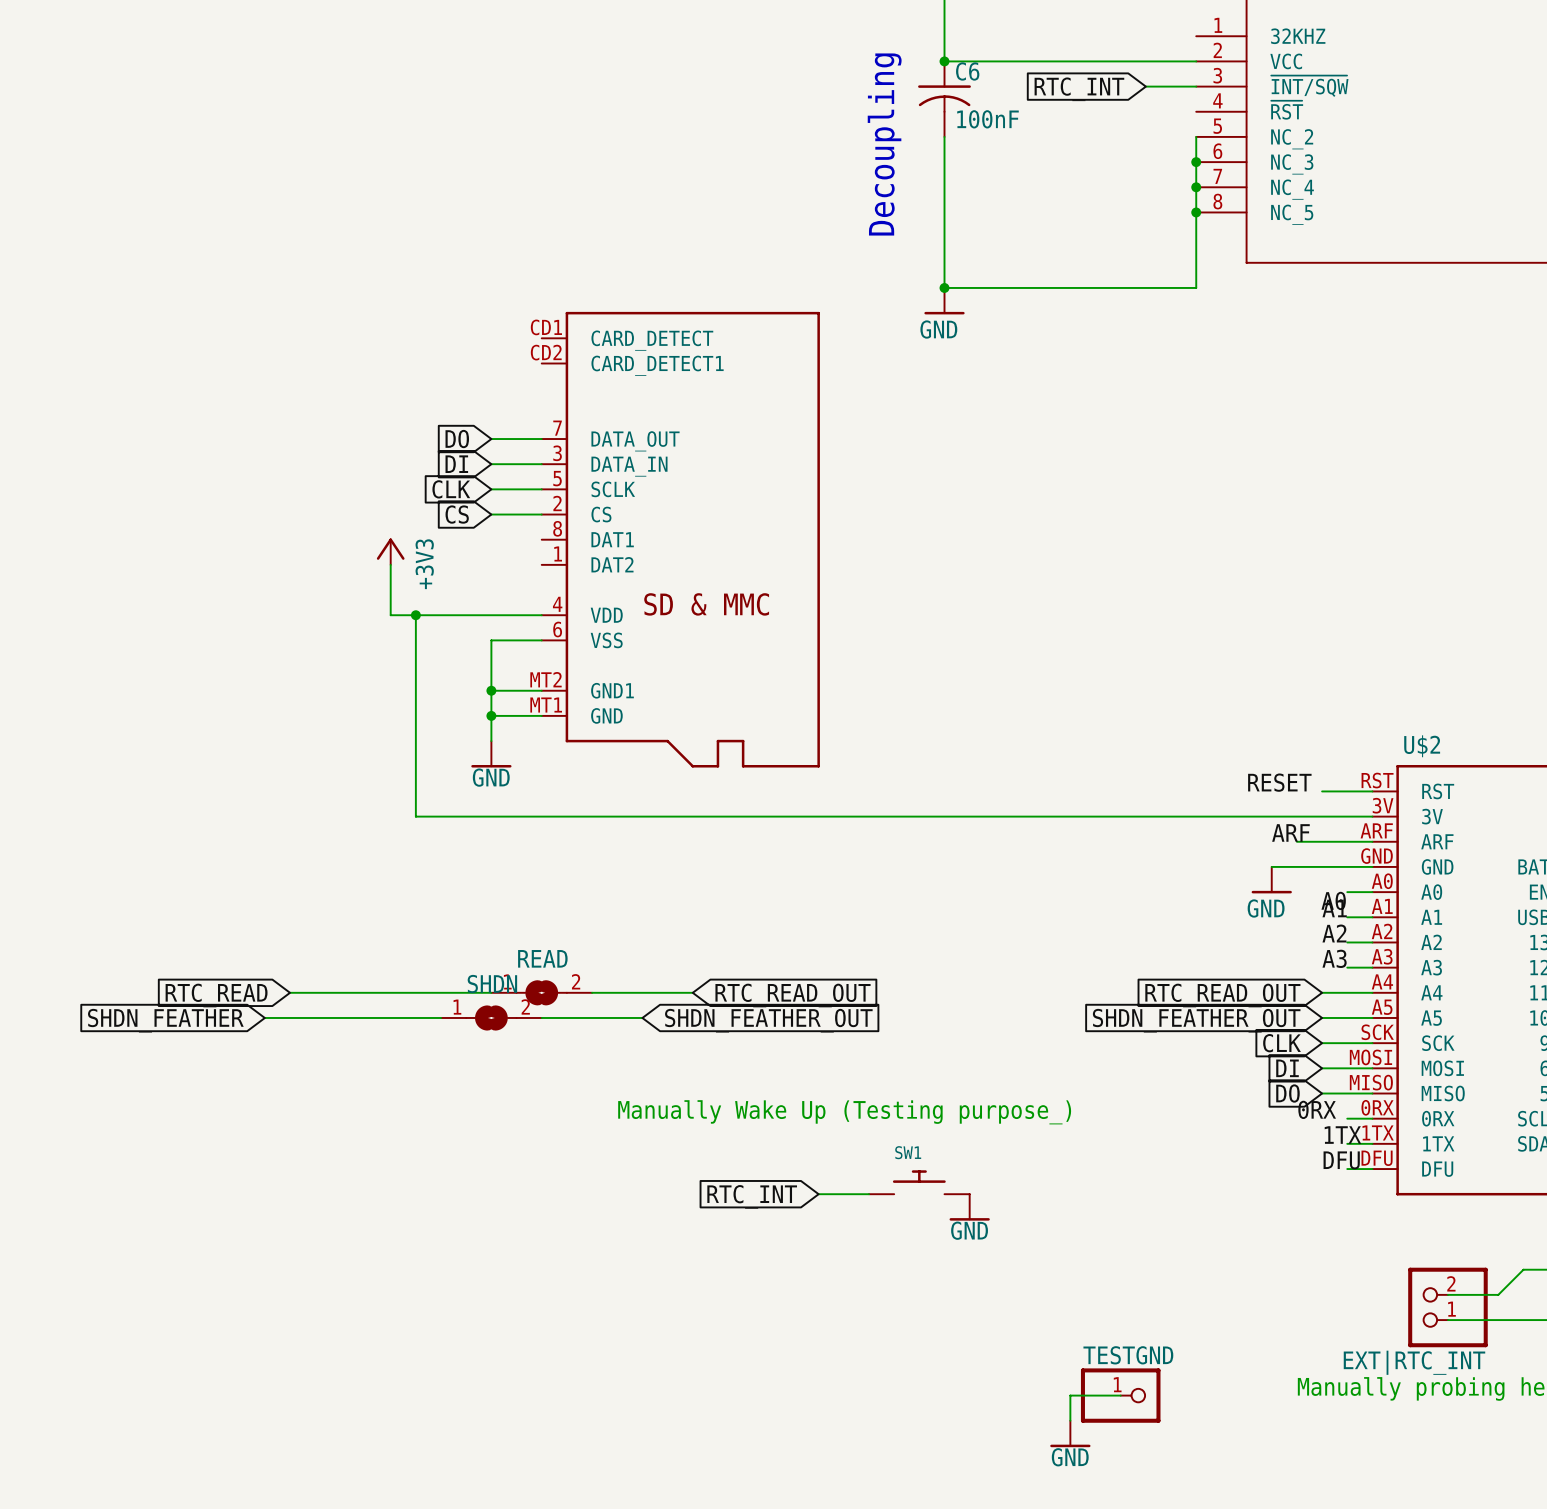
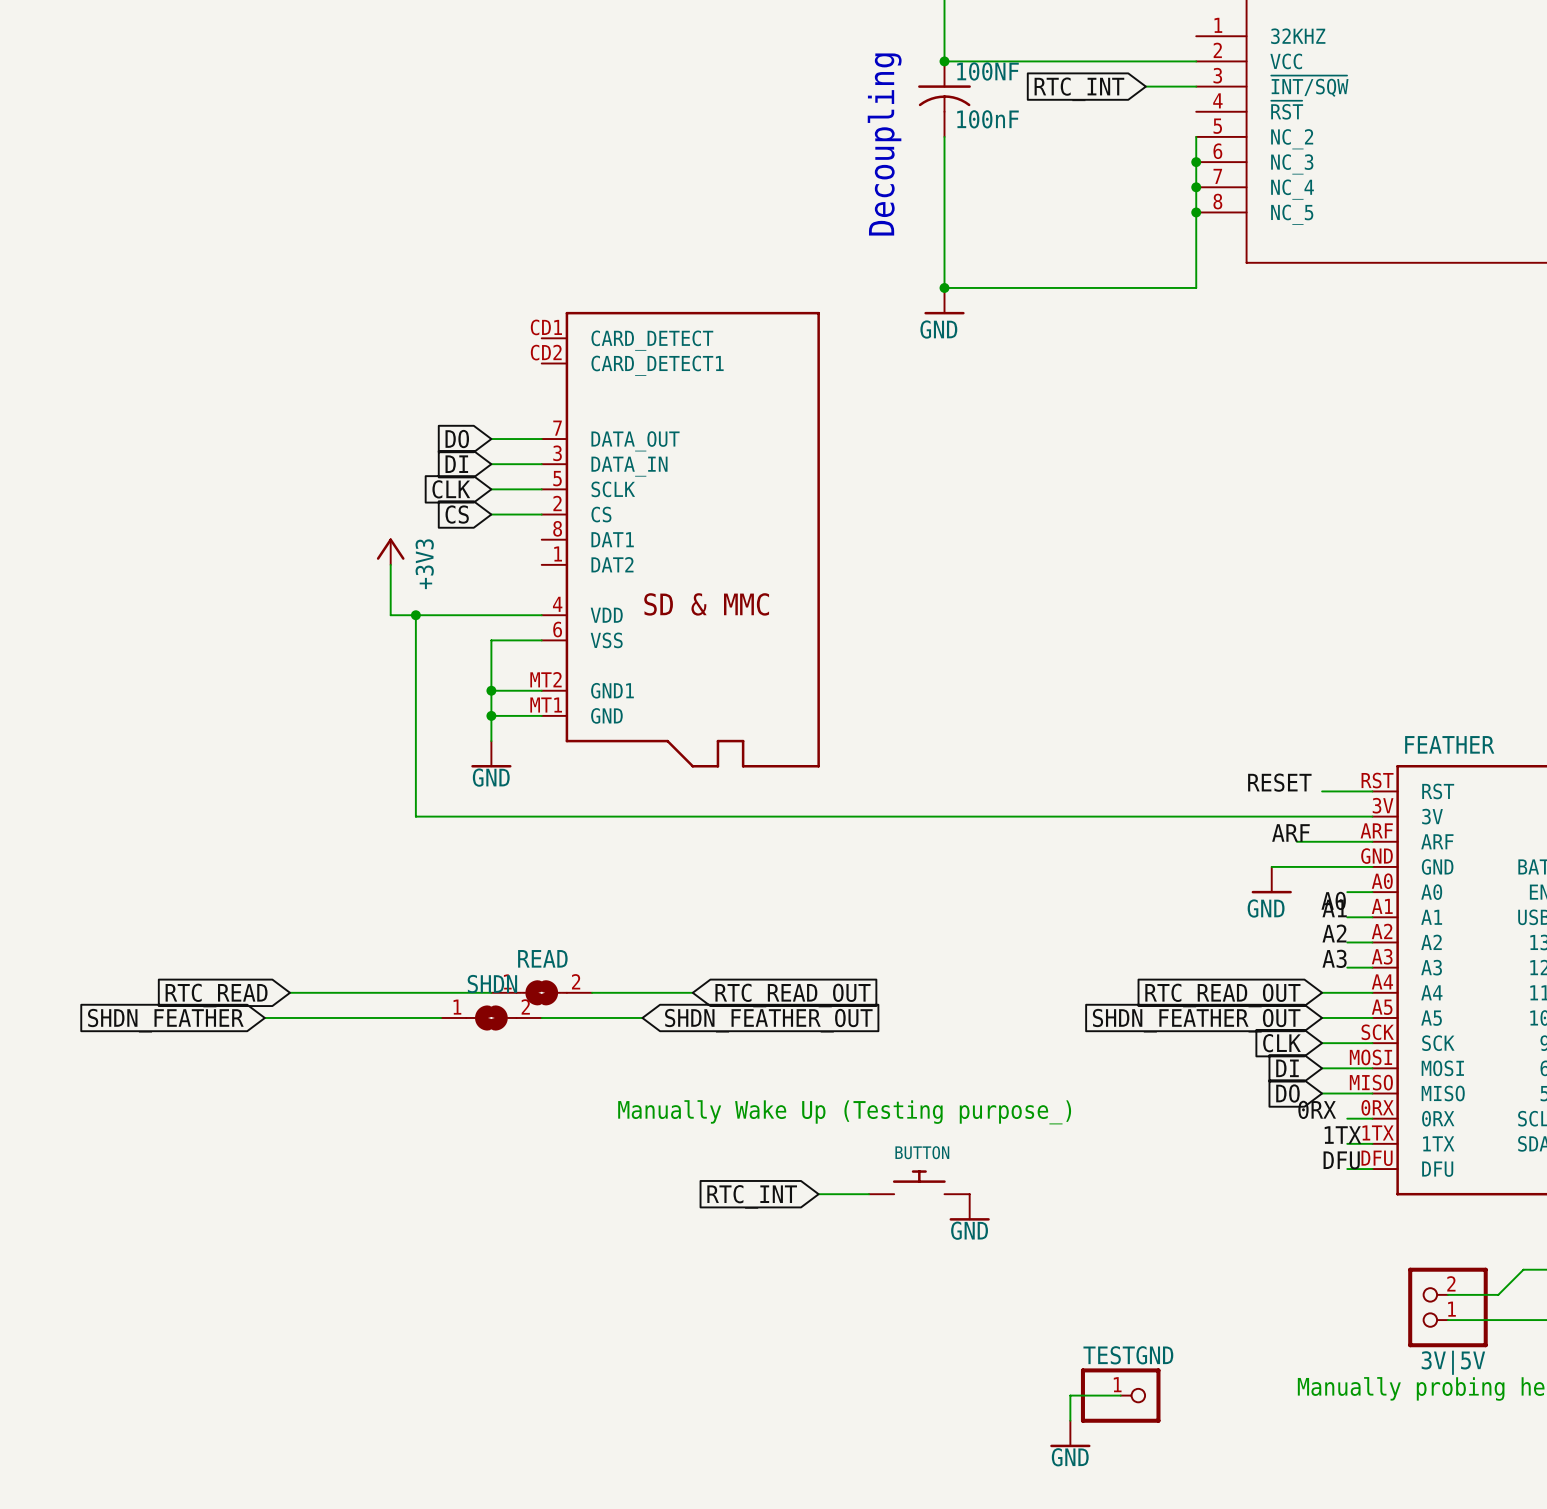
C6 name: C6 (967, 71) -> 100NF (987, 71)
U$2 name: U$2 (1422, 746) -> FEATHER (1449, 744)
SW1 name: SW1 (908, 1152) -> BUTTON (922, 1152)
EXT|RTC_INT name: EXT|RTC_INT (1414, 1362) -> 3V|5V (1453, 1362)

